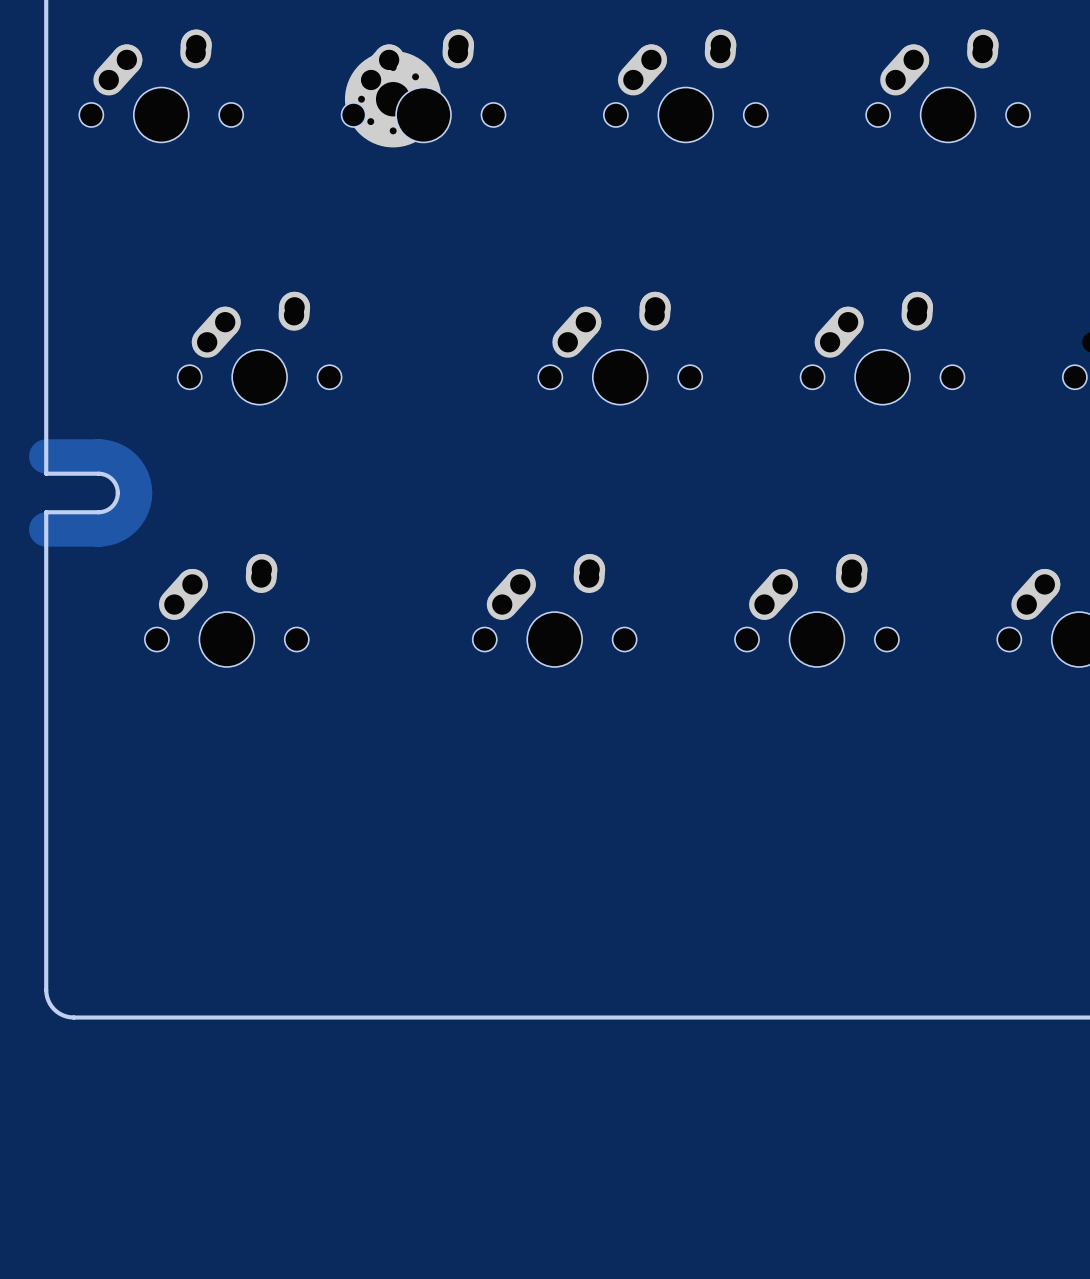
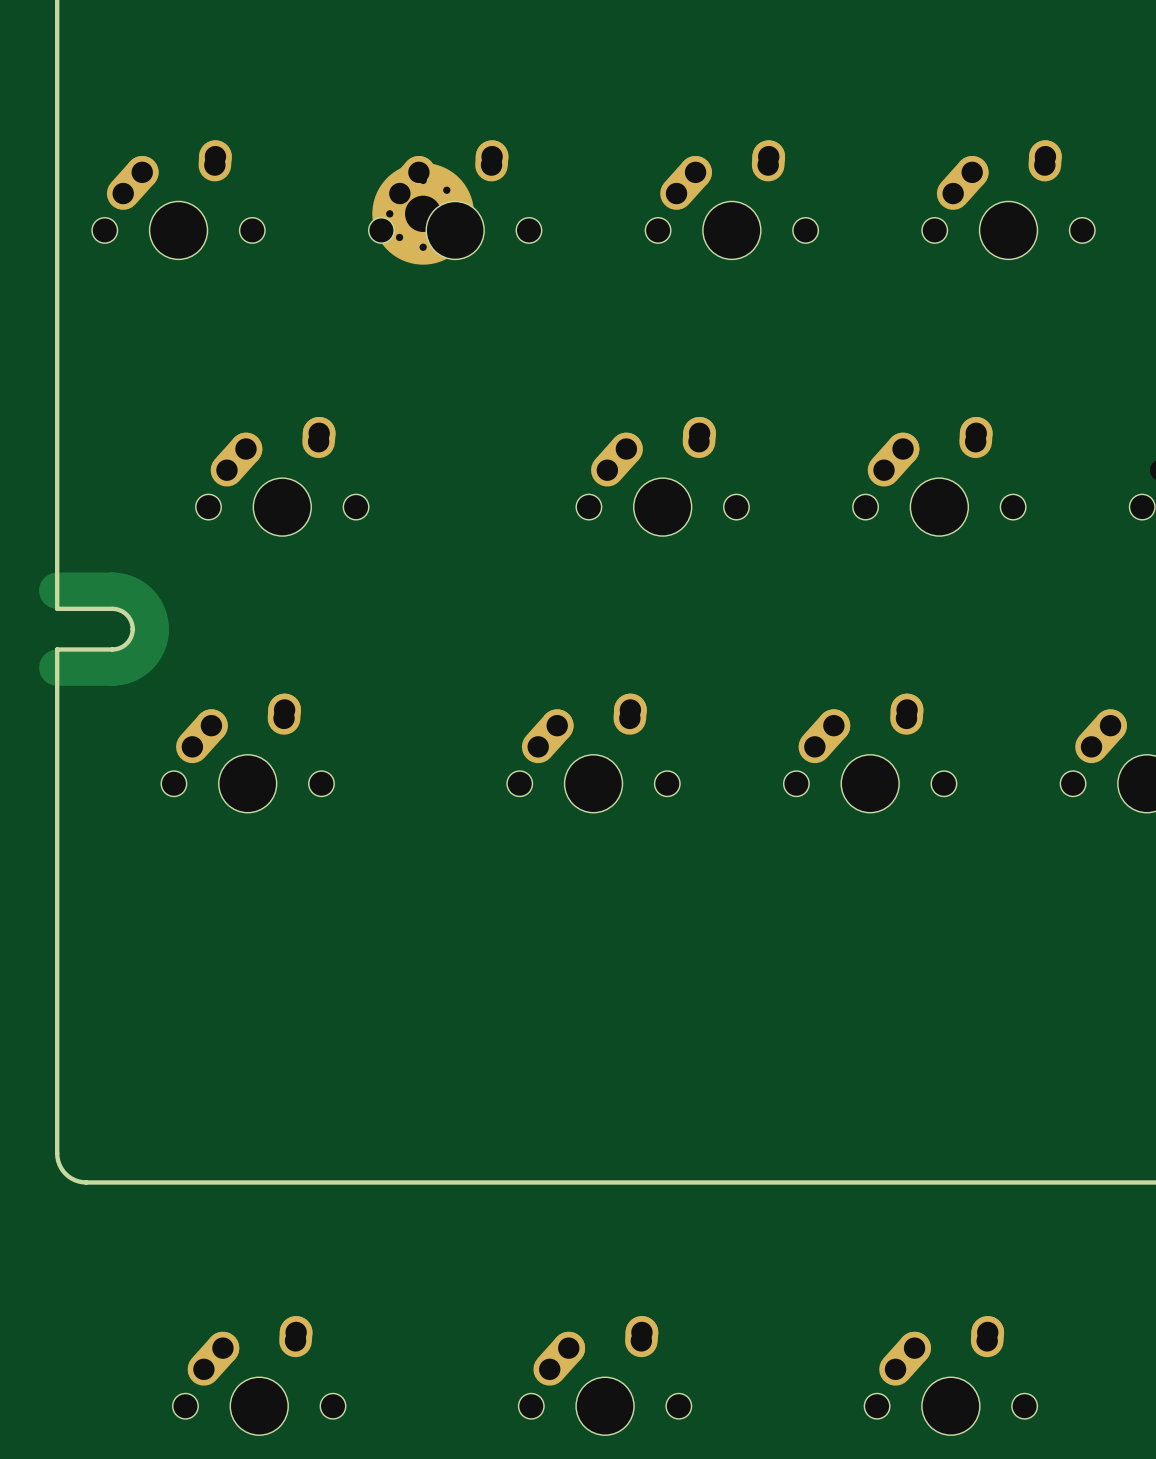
part: none -> (259, 1375)
part: none -> (605, 1375)
part: none -> (950, 1375)

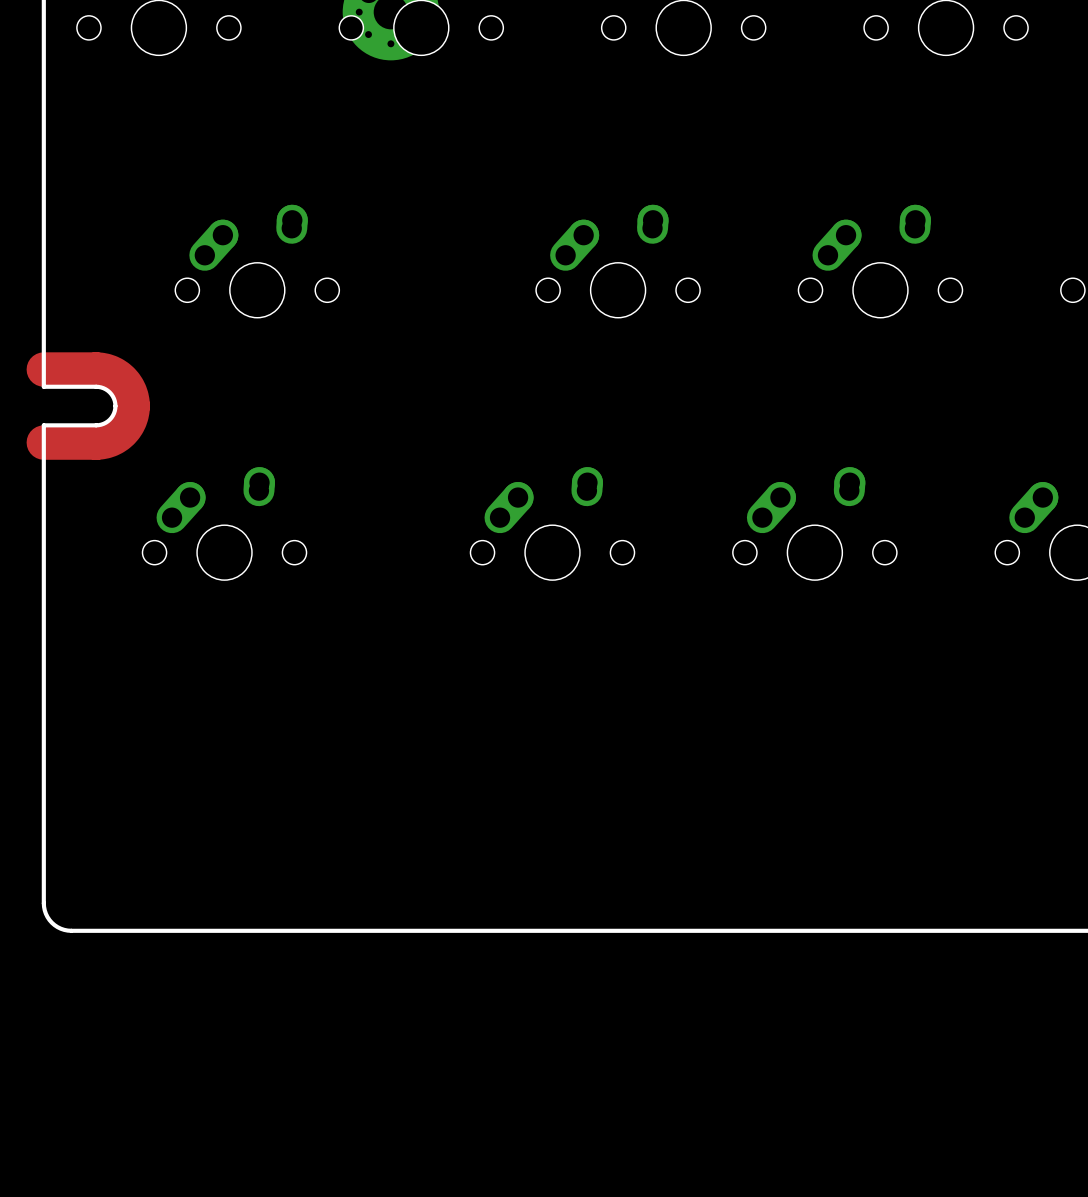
part: (259, 1375) -> none
part: (605, 1375) -> none
part: (950, 1375) -> none

